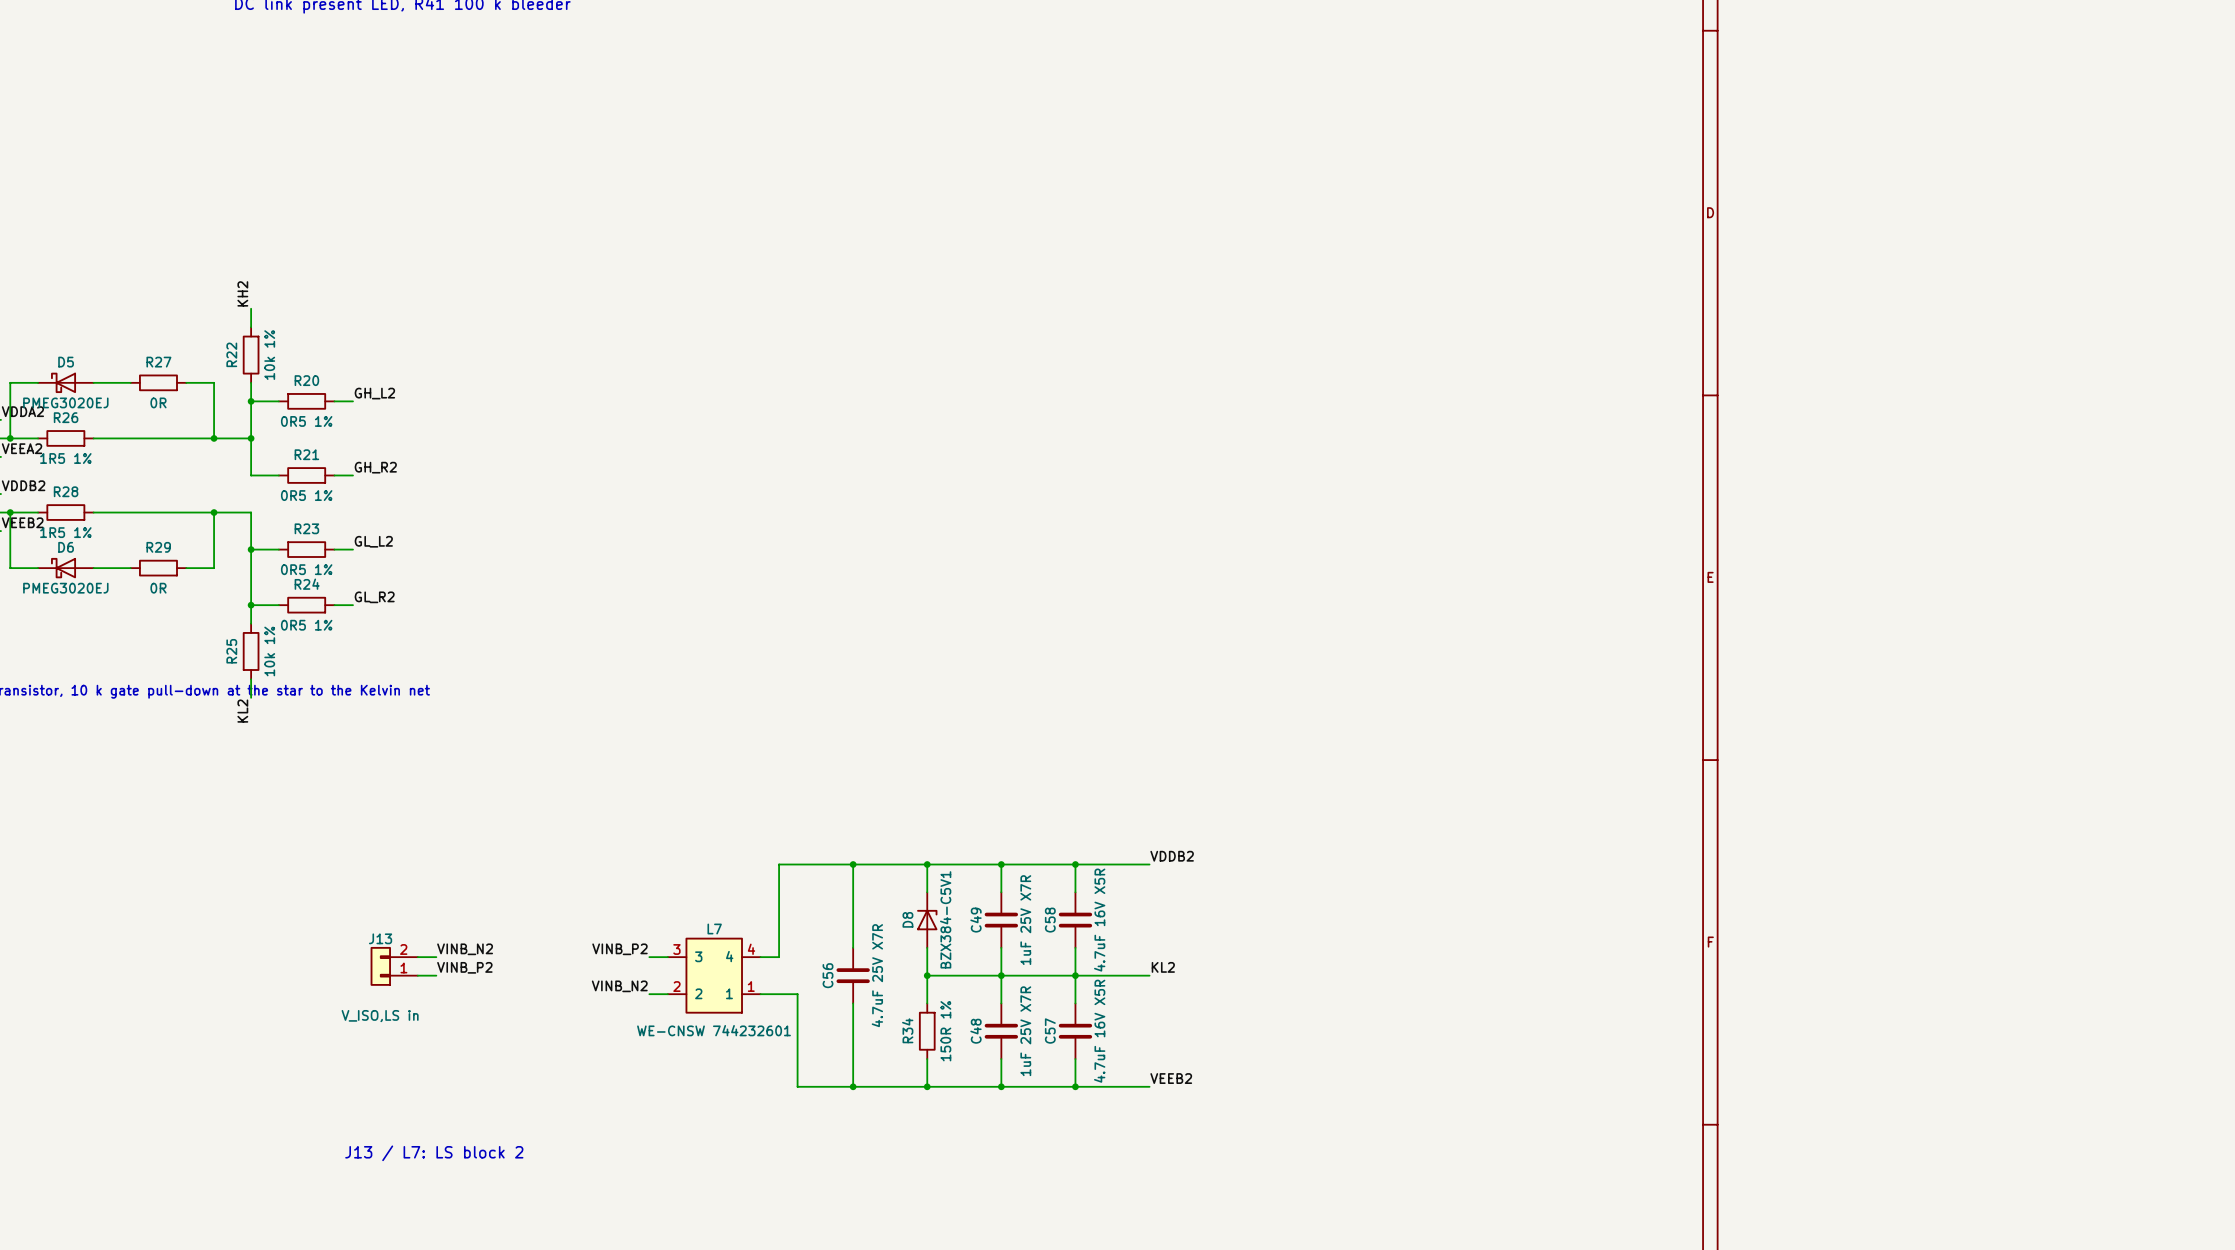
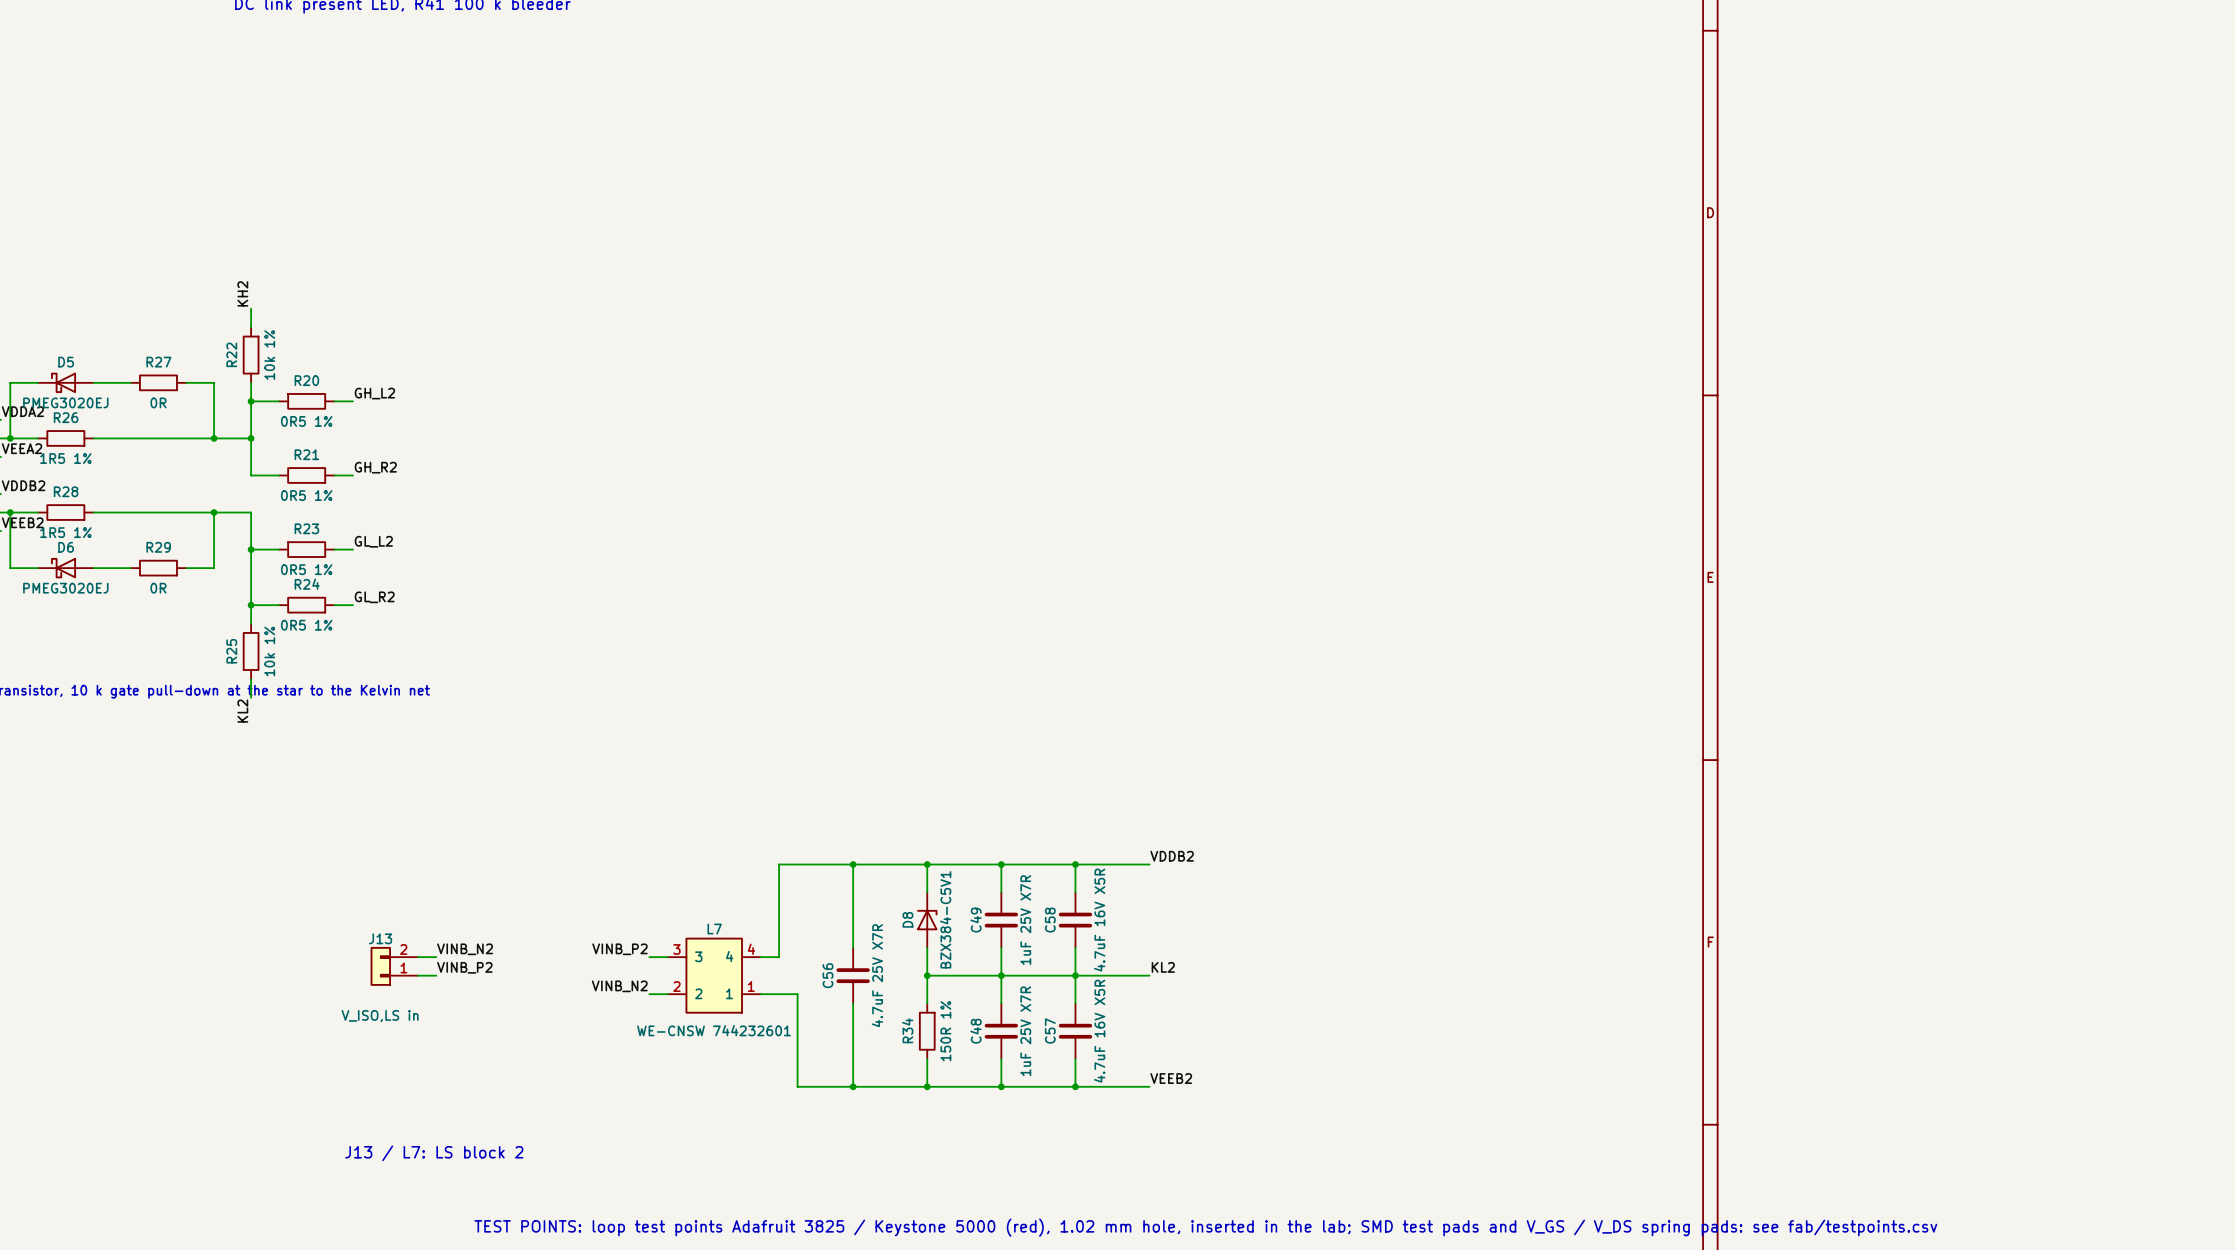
text: none -> TEST POINTS: loop test points Adafruit 3825 / Keystone 5000 (red), 1.02 mm hole, inserted in the lab; SMD test pads and V_GS / V_DS spring pads: see fab/testpoints.csv (1205, 1227)

